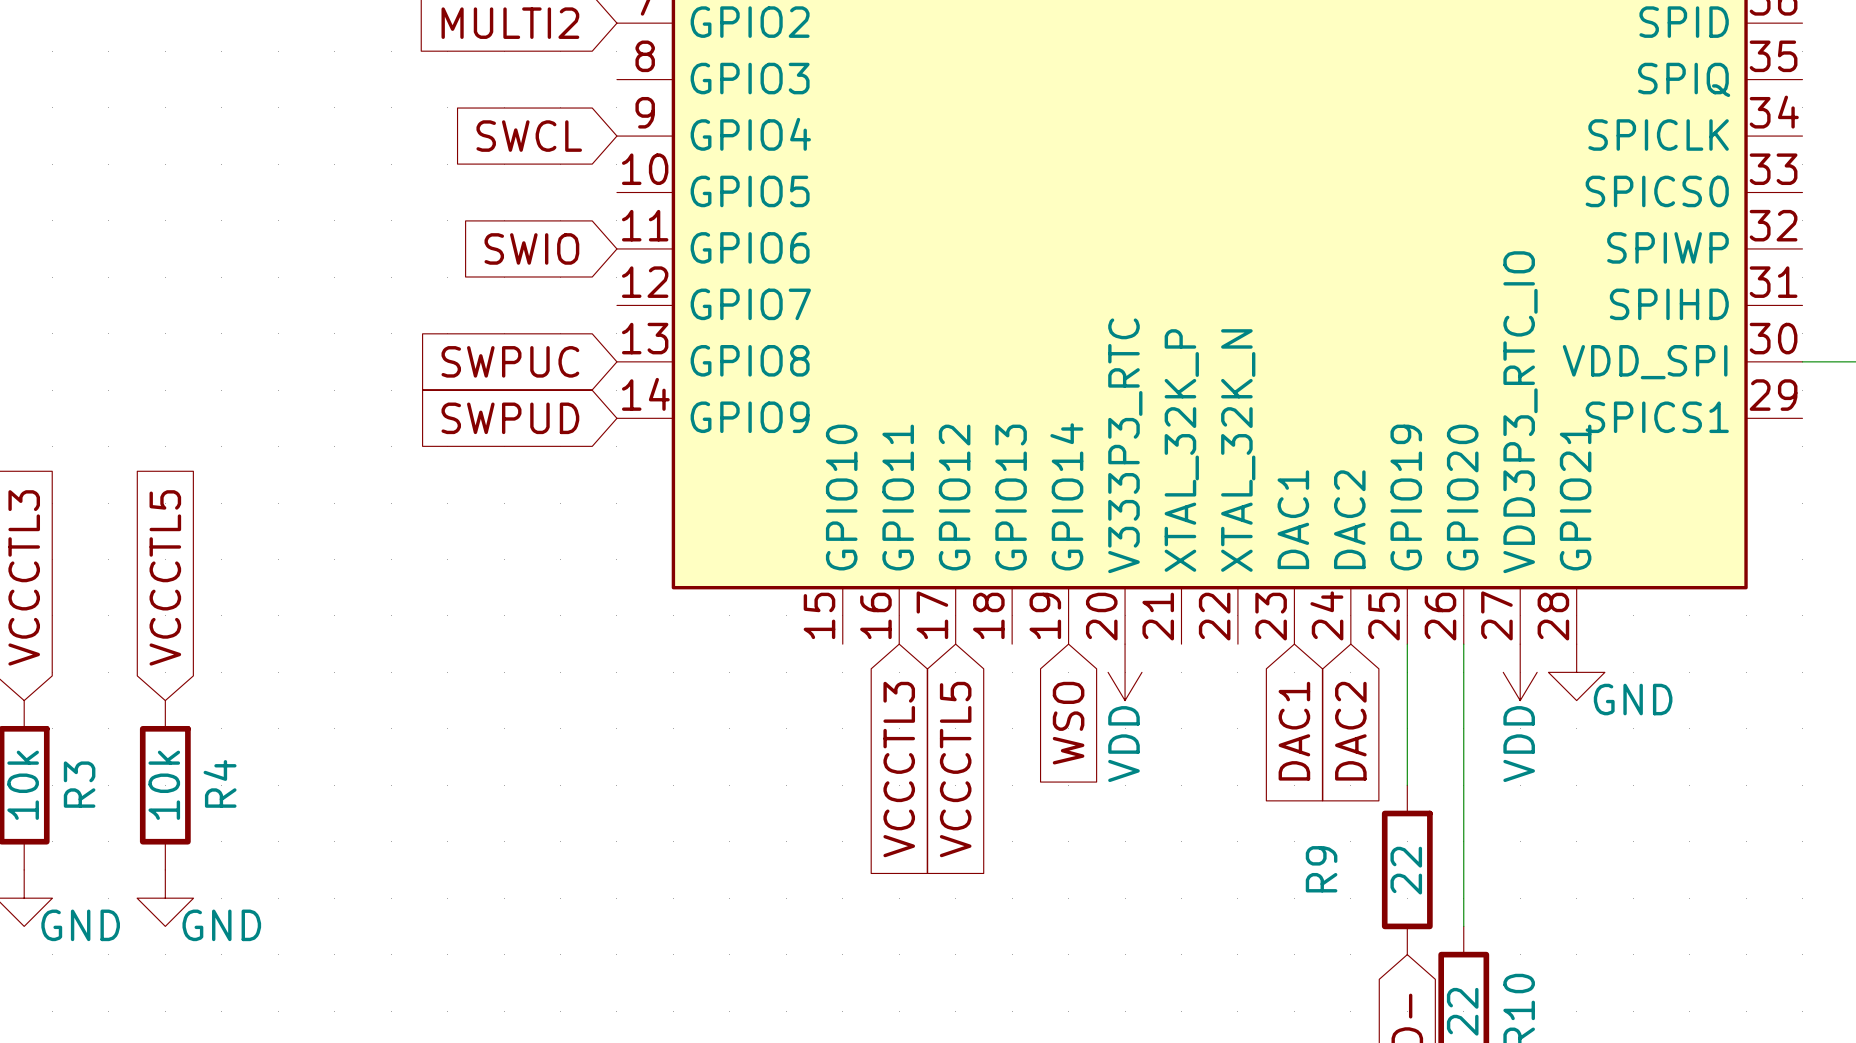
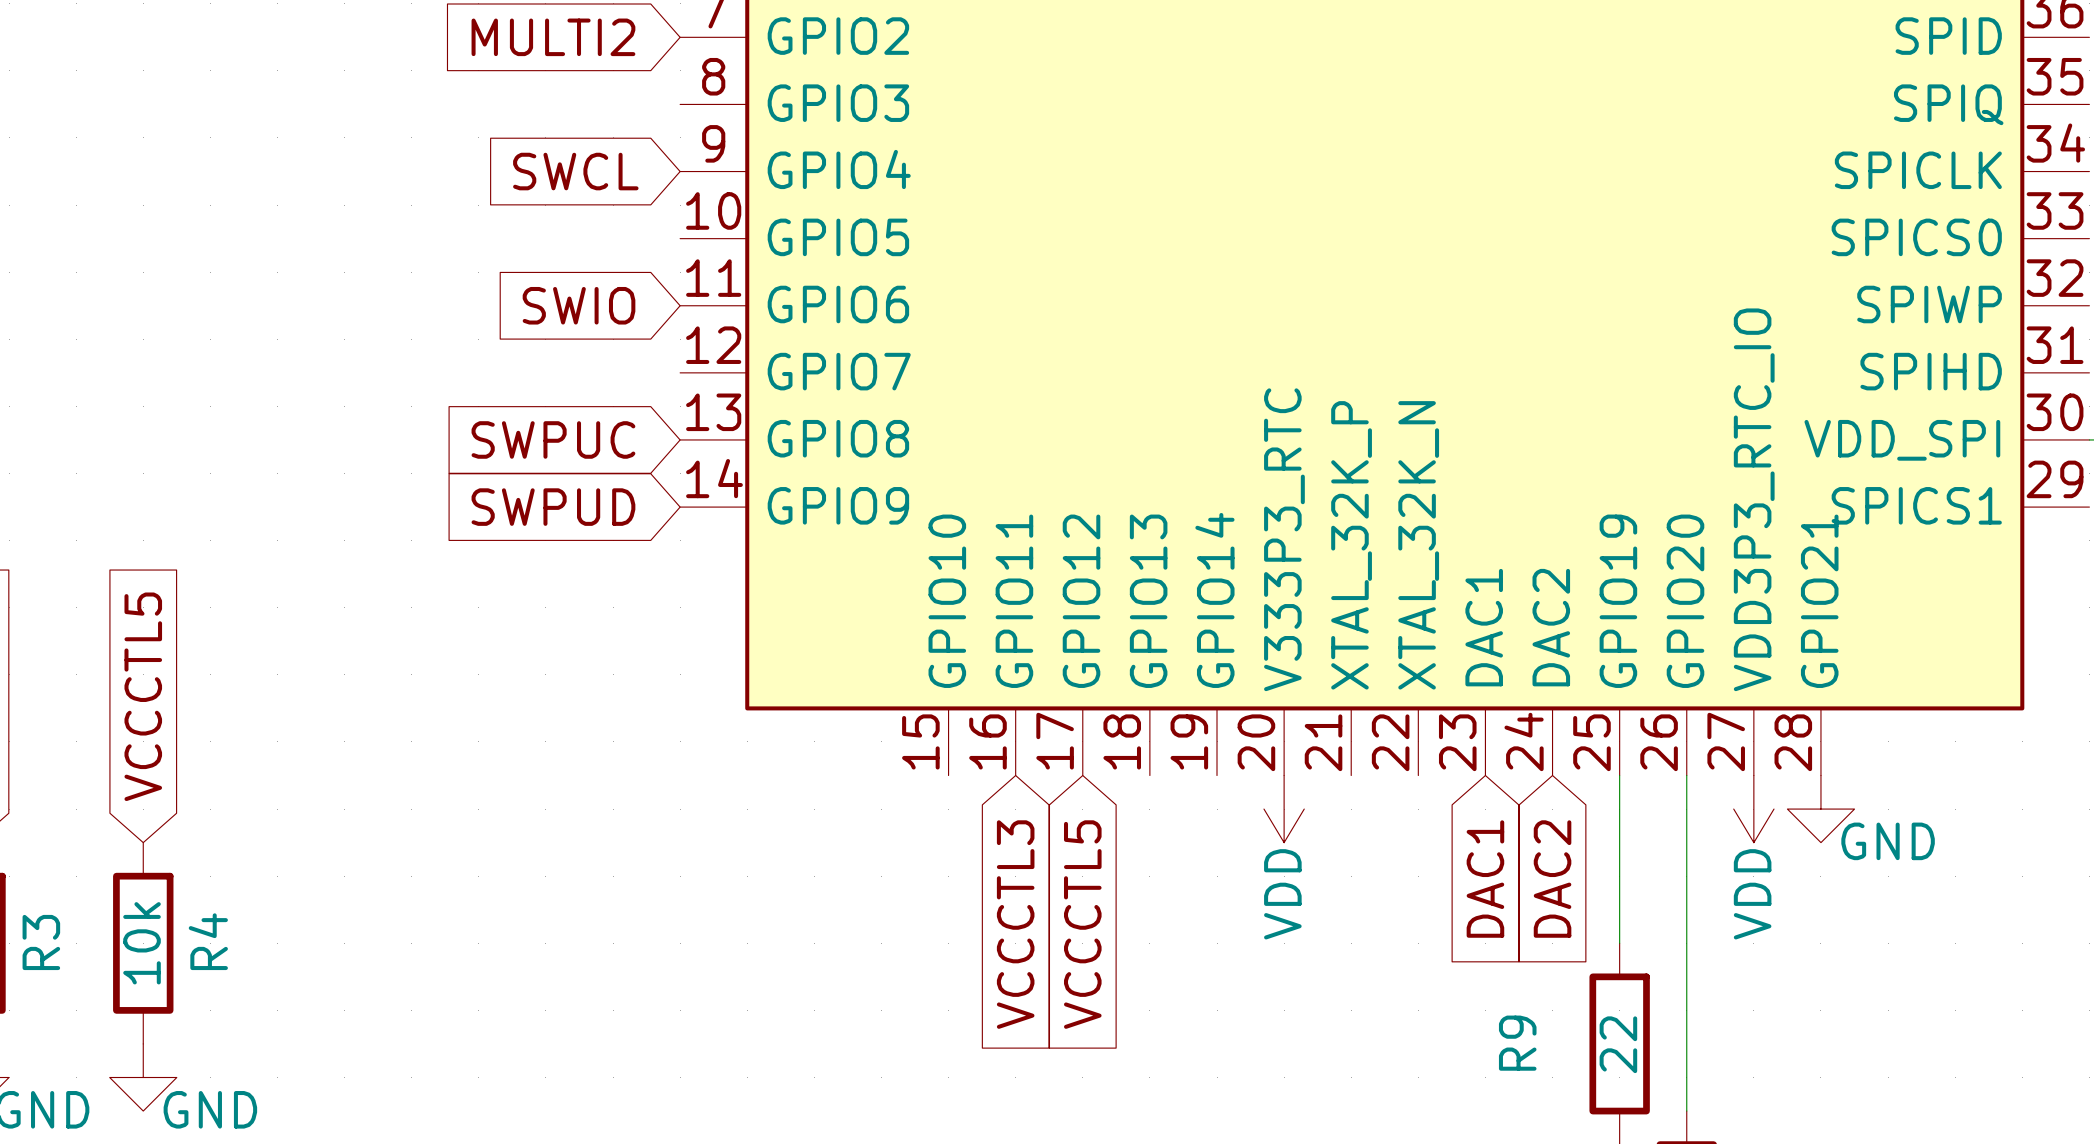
global label: WSO (1068, 723) -> none

